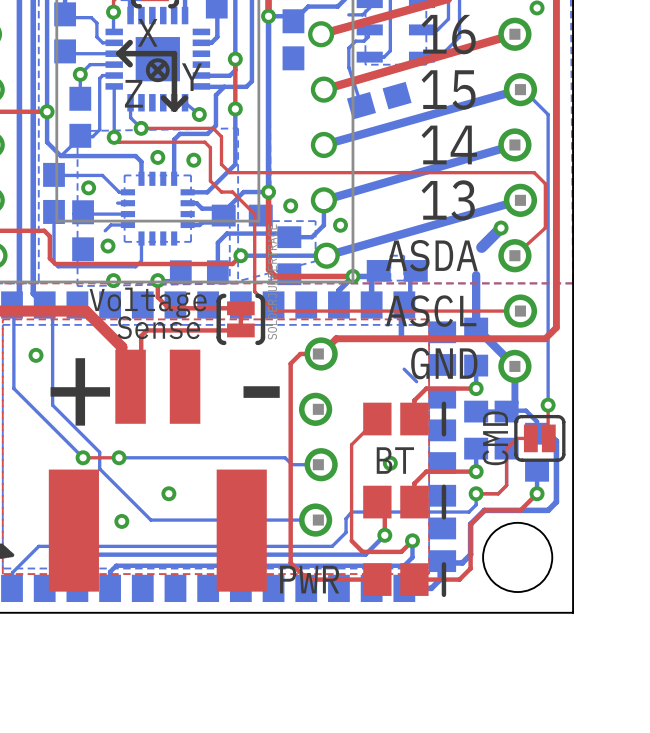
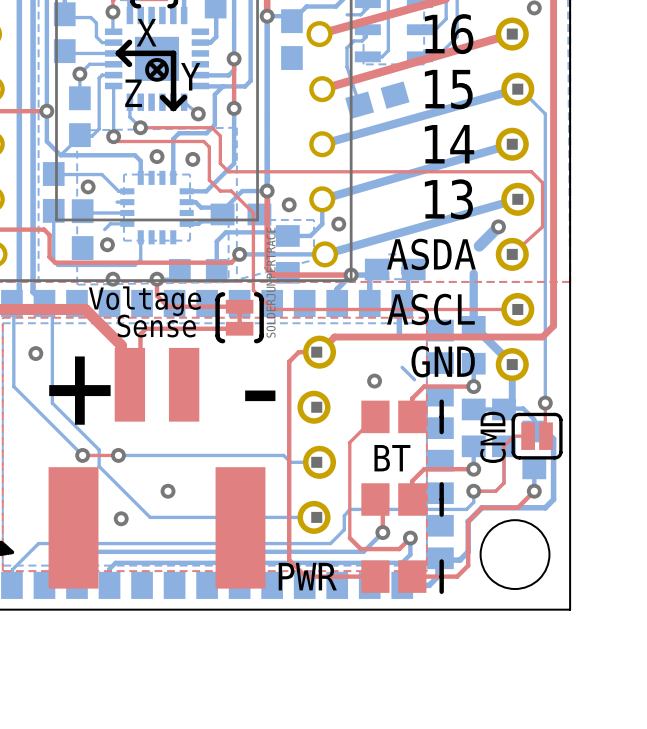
via position: (390, 463) -> (374, 381)

